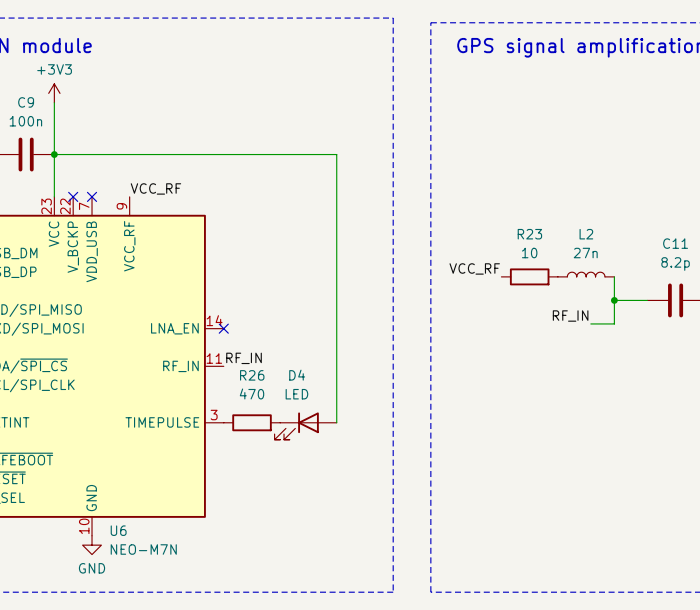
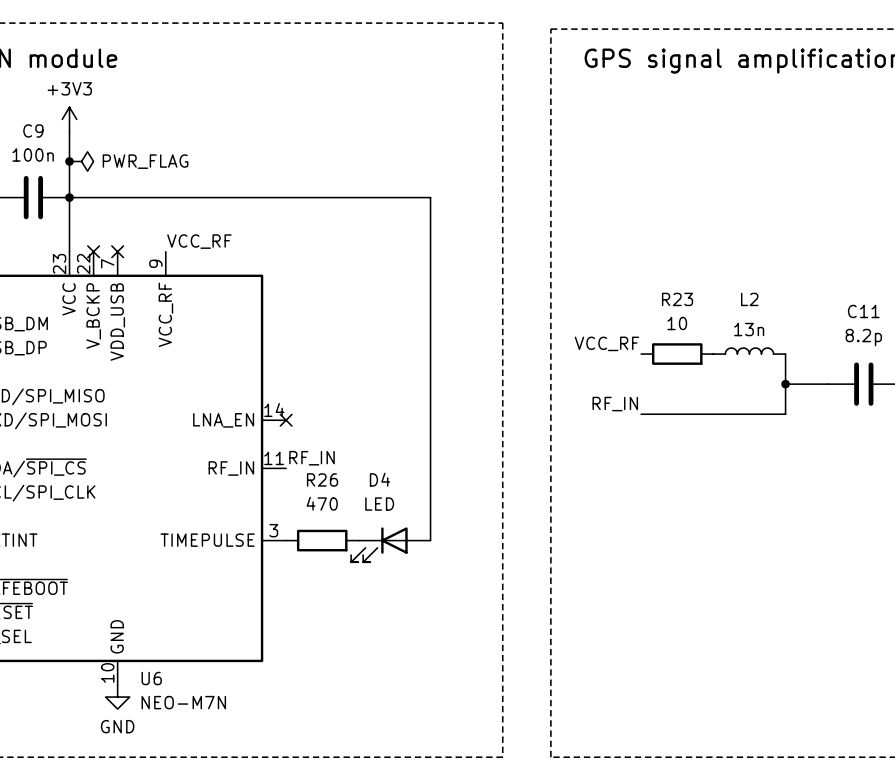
junction: none -> (69, 161)
power symbol: none -> PWR_FLAG (81, 161)
L2 value: 27n (585, 253) -> 13n (749, 329)
label position: RF_IN (570, 316) -> RF_IN (615, 404)
wire: none -> (641, 414) (755, 414)

